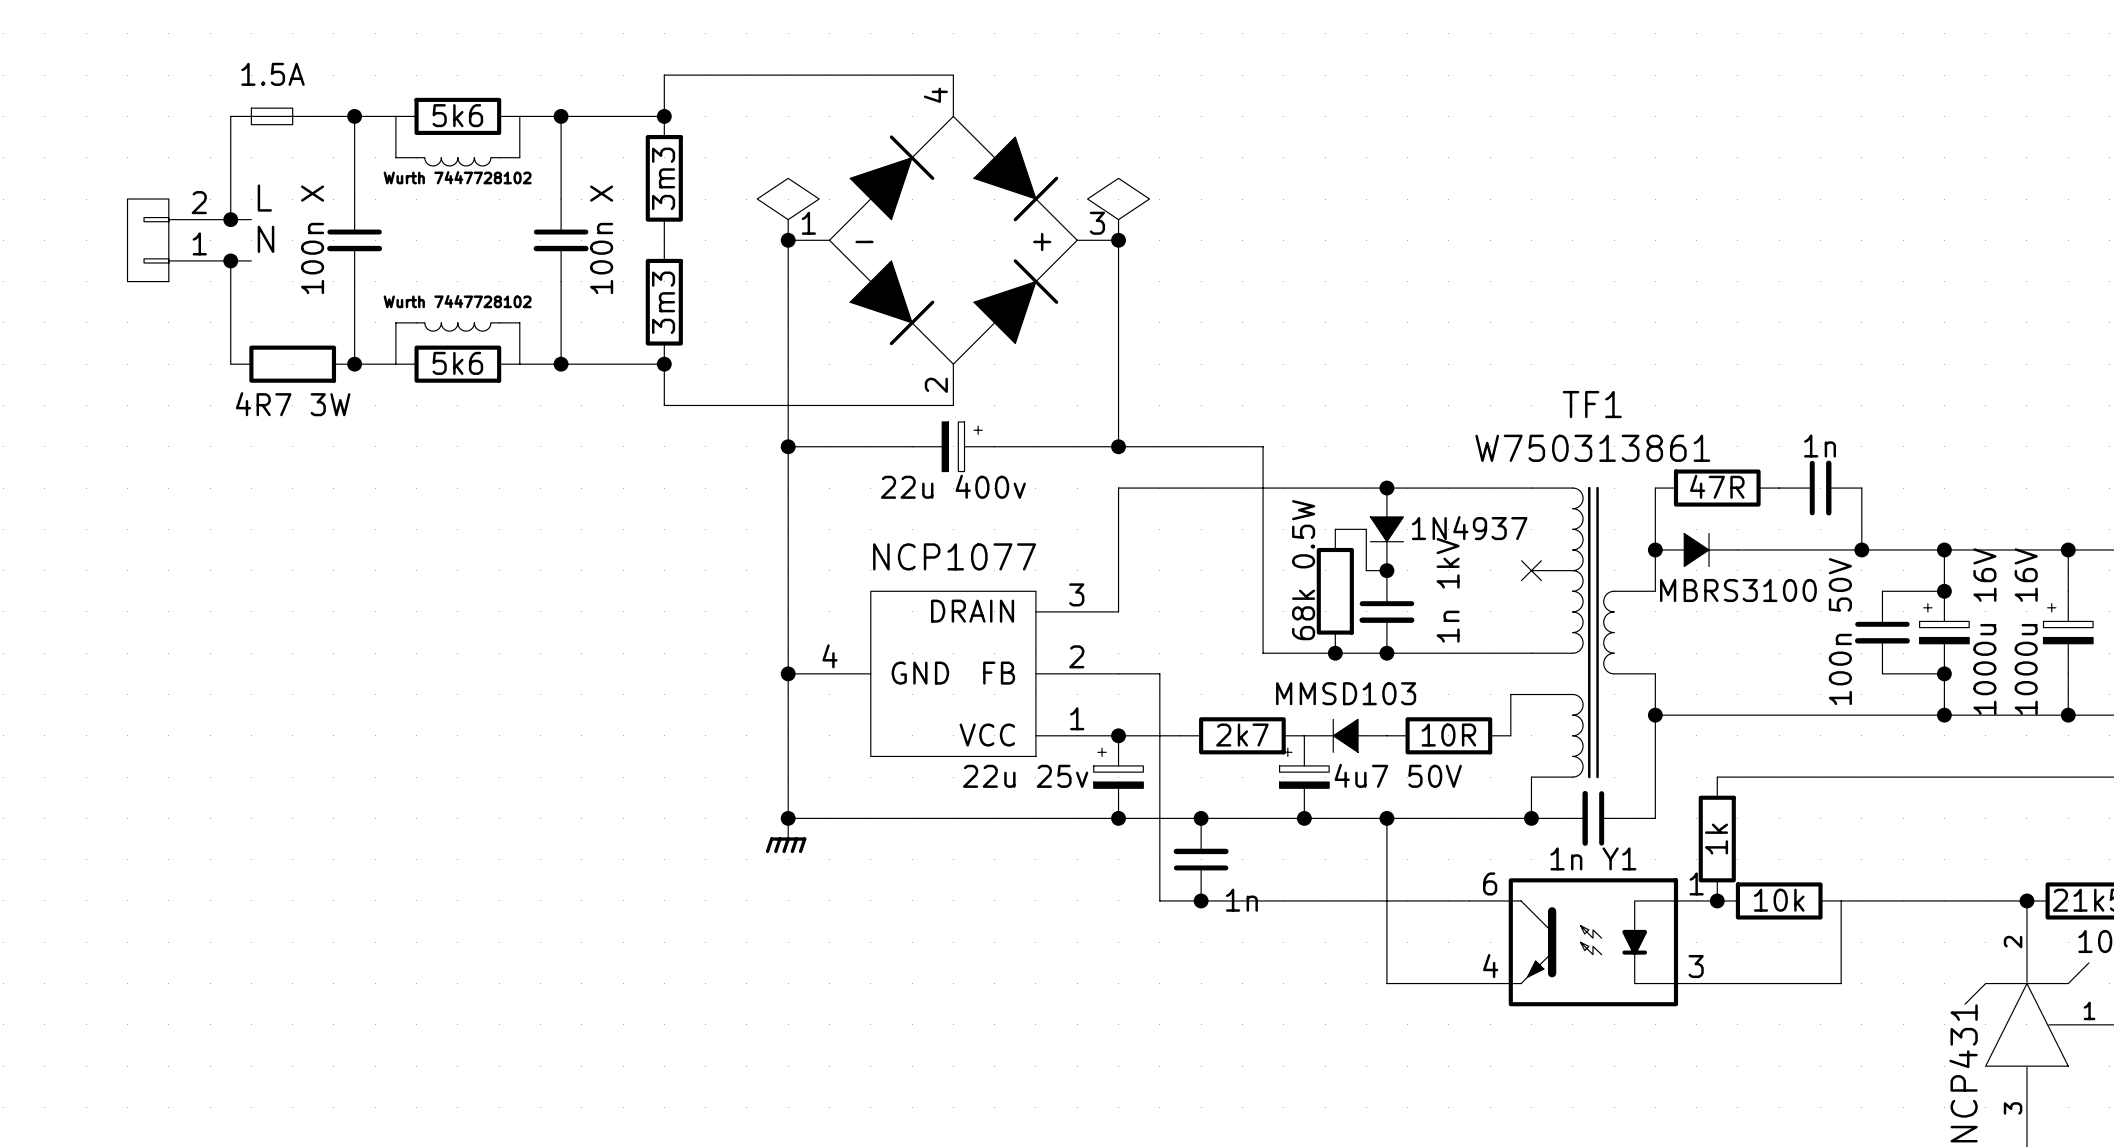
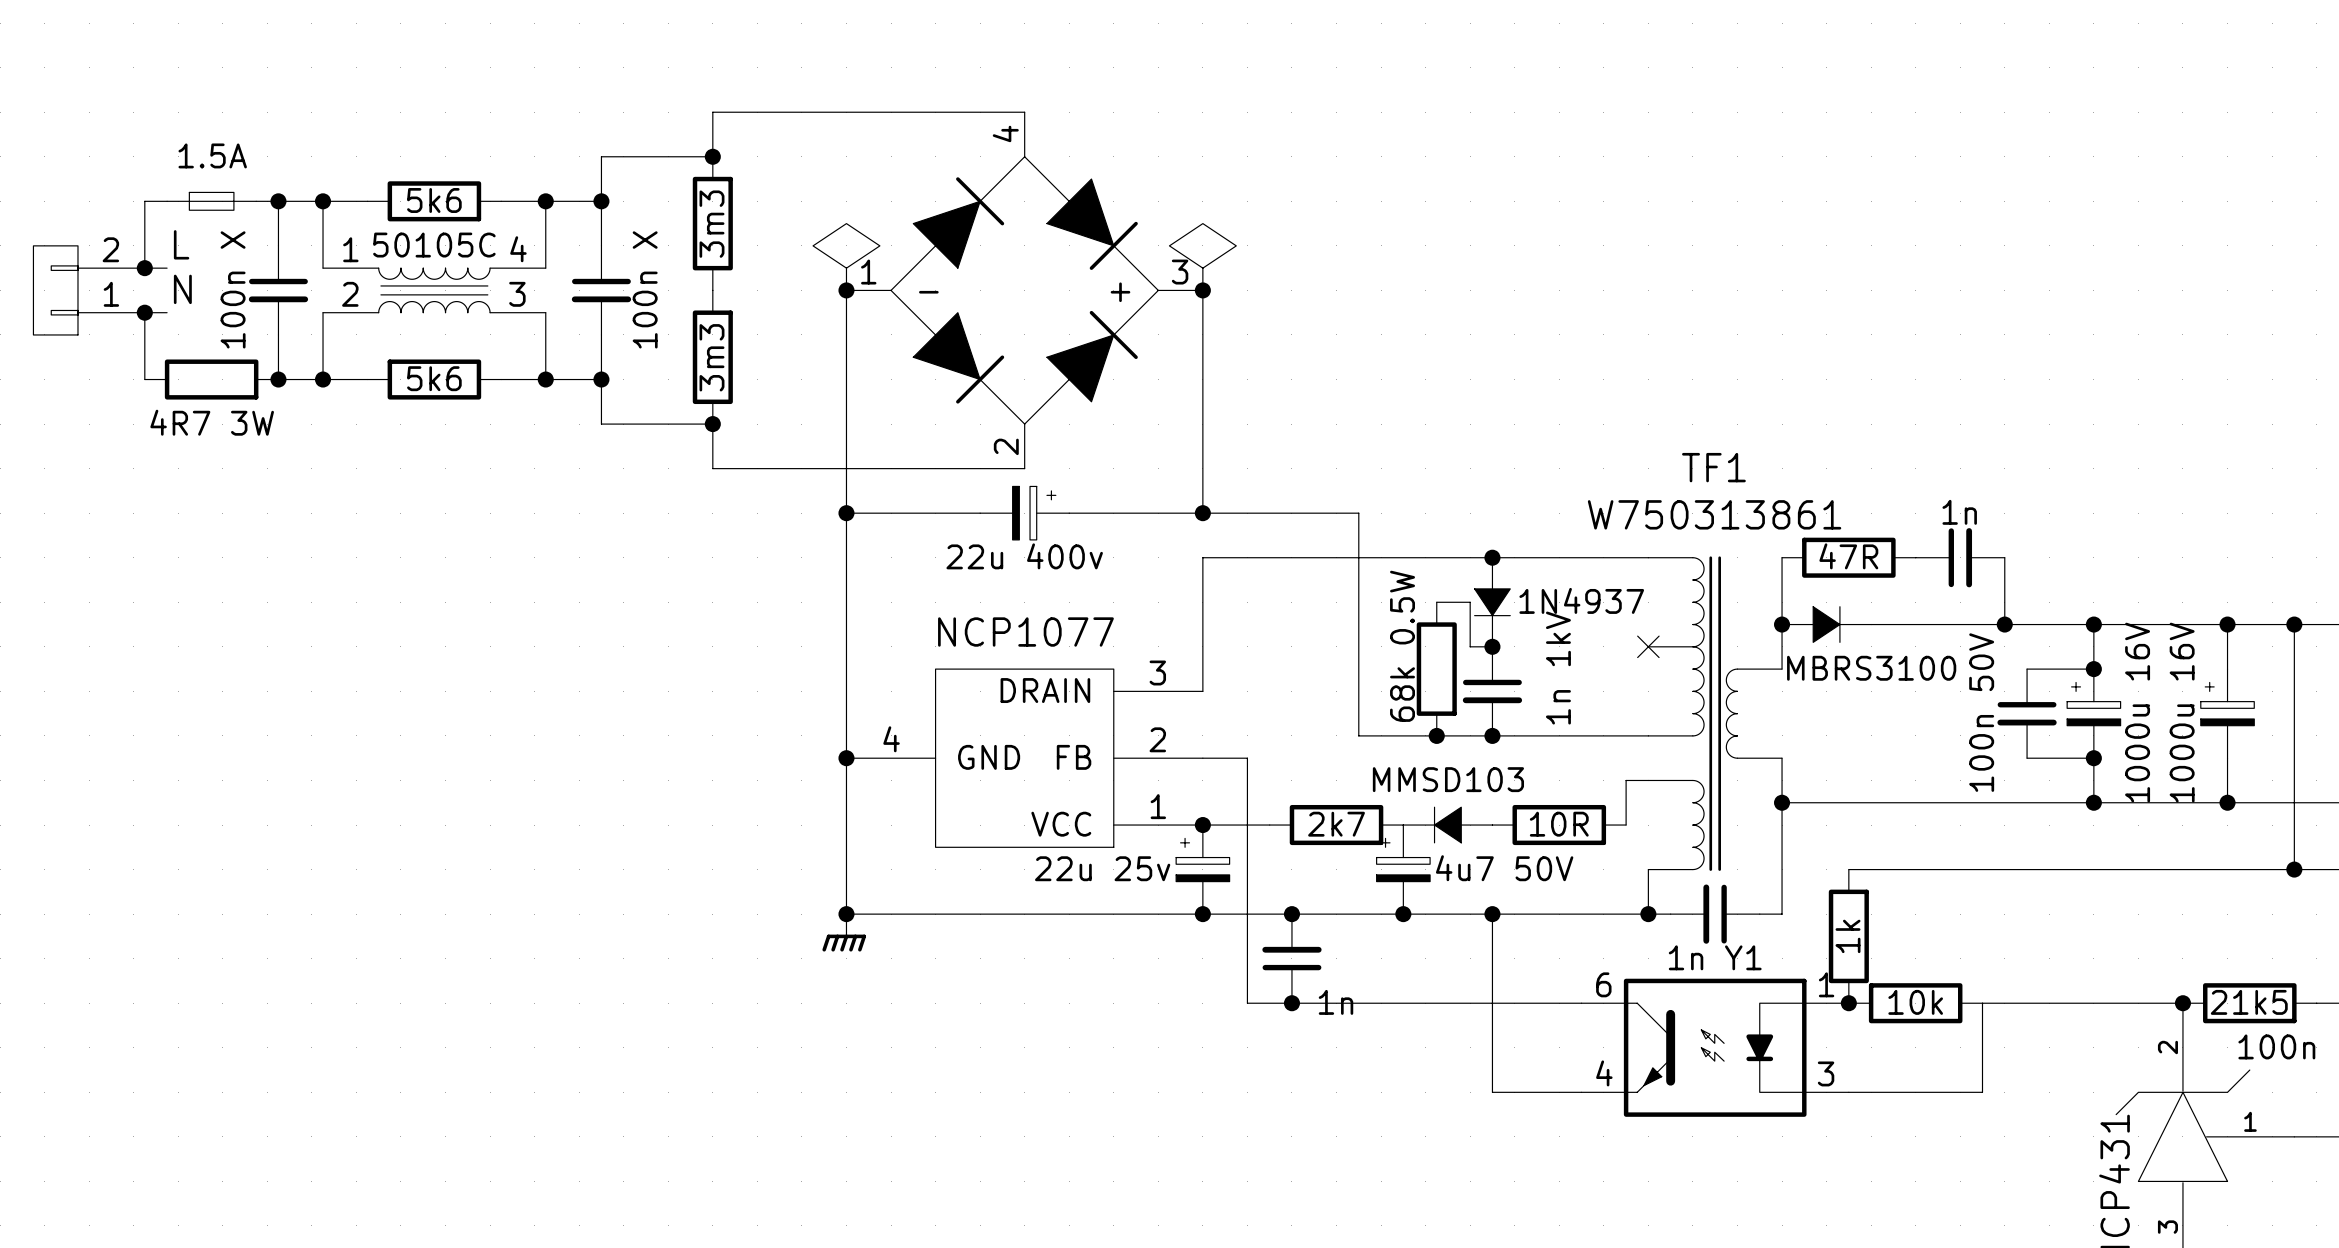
wire: (230, 116) (230, 219) (251, 219) -> none
part position: (272, 116) -> (211, 201)
wire: (313, 116) (395, 116) (395, 157) (416, 157) -> none
wire: (354, 116) (354, 199) -> none
junction: (354, 116) -> none
part position: (457, 116) -> (434, 201)
wire: (561, 116) (519, 116) (519, 157) -> (601, 201) (556, 201)
junction: (561, 116) -> none
wire: none -> (167, 201) (144, 201) (144, 268) (167, 268)
wire: none -> (256, 201) (367, 201)
wire: none -> (278, 201) (278, 245)
junction: none -> (278, 201)
wire: none -> (323, 201) (323, 268)
junction: none -> (323, 201)
wire: none -> (501, 201) (534, 201)
wire: none -> (545, 201) (545, 268)
junction: none -> (545, 201)
junction: none -> (601, 201)
part: Wurth 7447728102 (457, 161) -> none
label position: L (264, 198) -> L (181, 244)
junction: none -> (144, 268)
junction: (230, 219) -> none
label position: N (265, 239) -> N (182, 289)
part position: (179, 240) -> (89, 290)
part position: (354, 240) -> (278, 290)
part: none -> 50105C (434, 290)
junction: none -> (144, 312)
wire: none -> (167, 312) (144, 312) (144, 379)
junction: (230, 260) -> none
wire: (251, 260) (230, 260) (230, 364) -> none
wire: none -> (323, 312) (323, 379)
wire: none -> (545, 312) (545, 379)
wire: none -> (278, 334) (278, 379) (367, 379)
wire: (354, 281) (354, 364) (395, 364) (395, 322) (416, 322) -> none
junction: none -> (278, 379)
junction: none -> (323, 379)
wire: none -> (501, 379) (534, 379)
junction: none -> (545, 379)
wire: (519, 322) (519, 364) (561, 364) -> (556, 379) (601, 379)
junction: none -> (601, 379)
part: Wurth 7447728102 (457, 327) -> none
part position: (292, 364) -> (211, 379)
junction: (354, 364) -> none
part position: (457, 364) -> (434, 379)
junction: (561, 364) -> none

